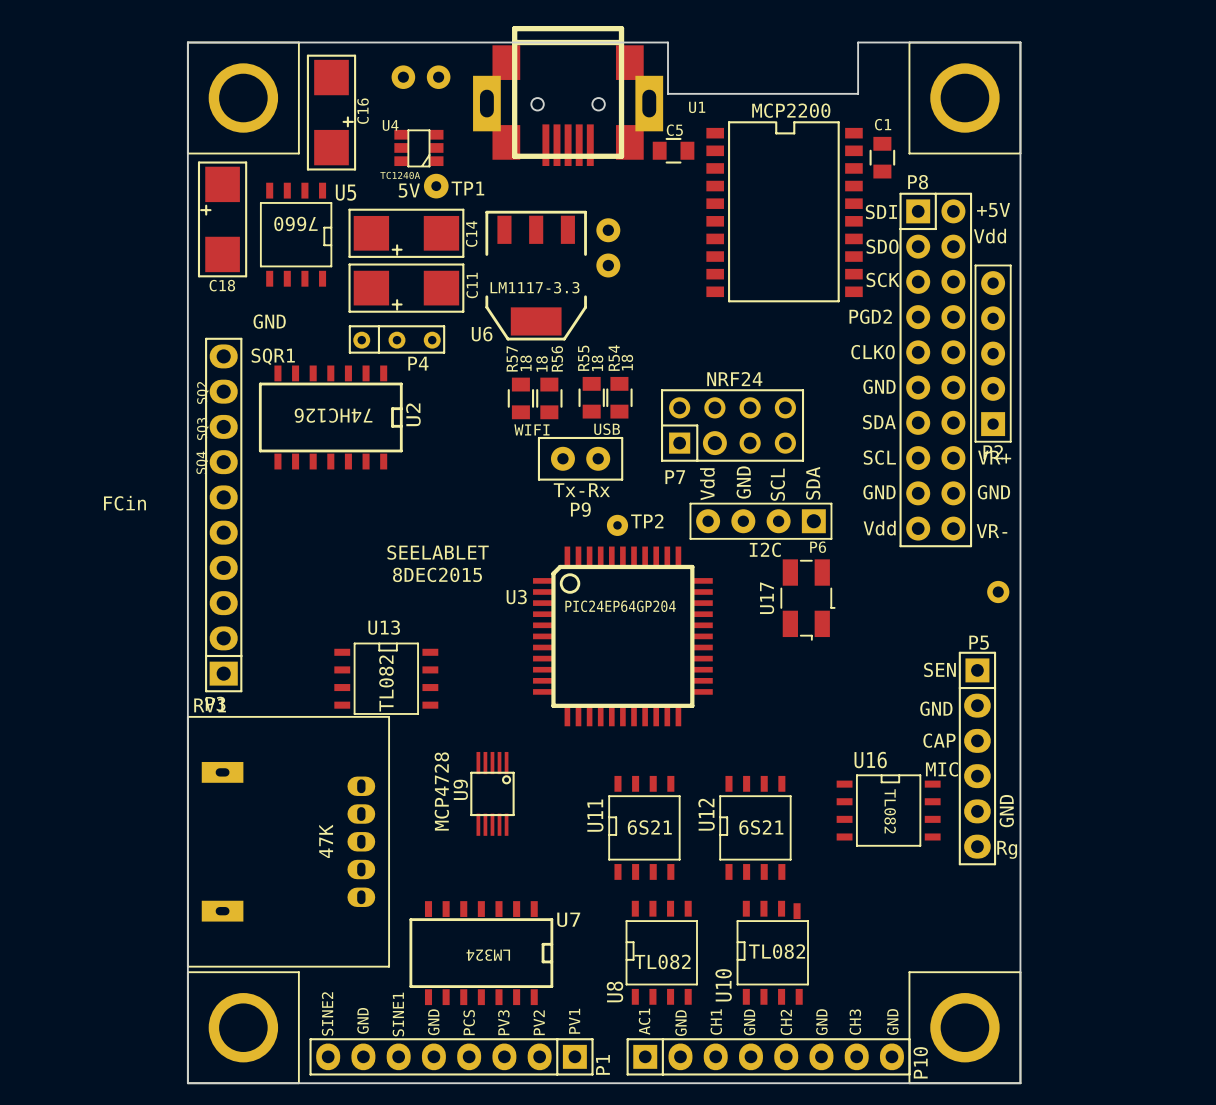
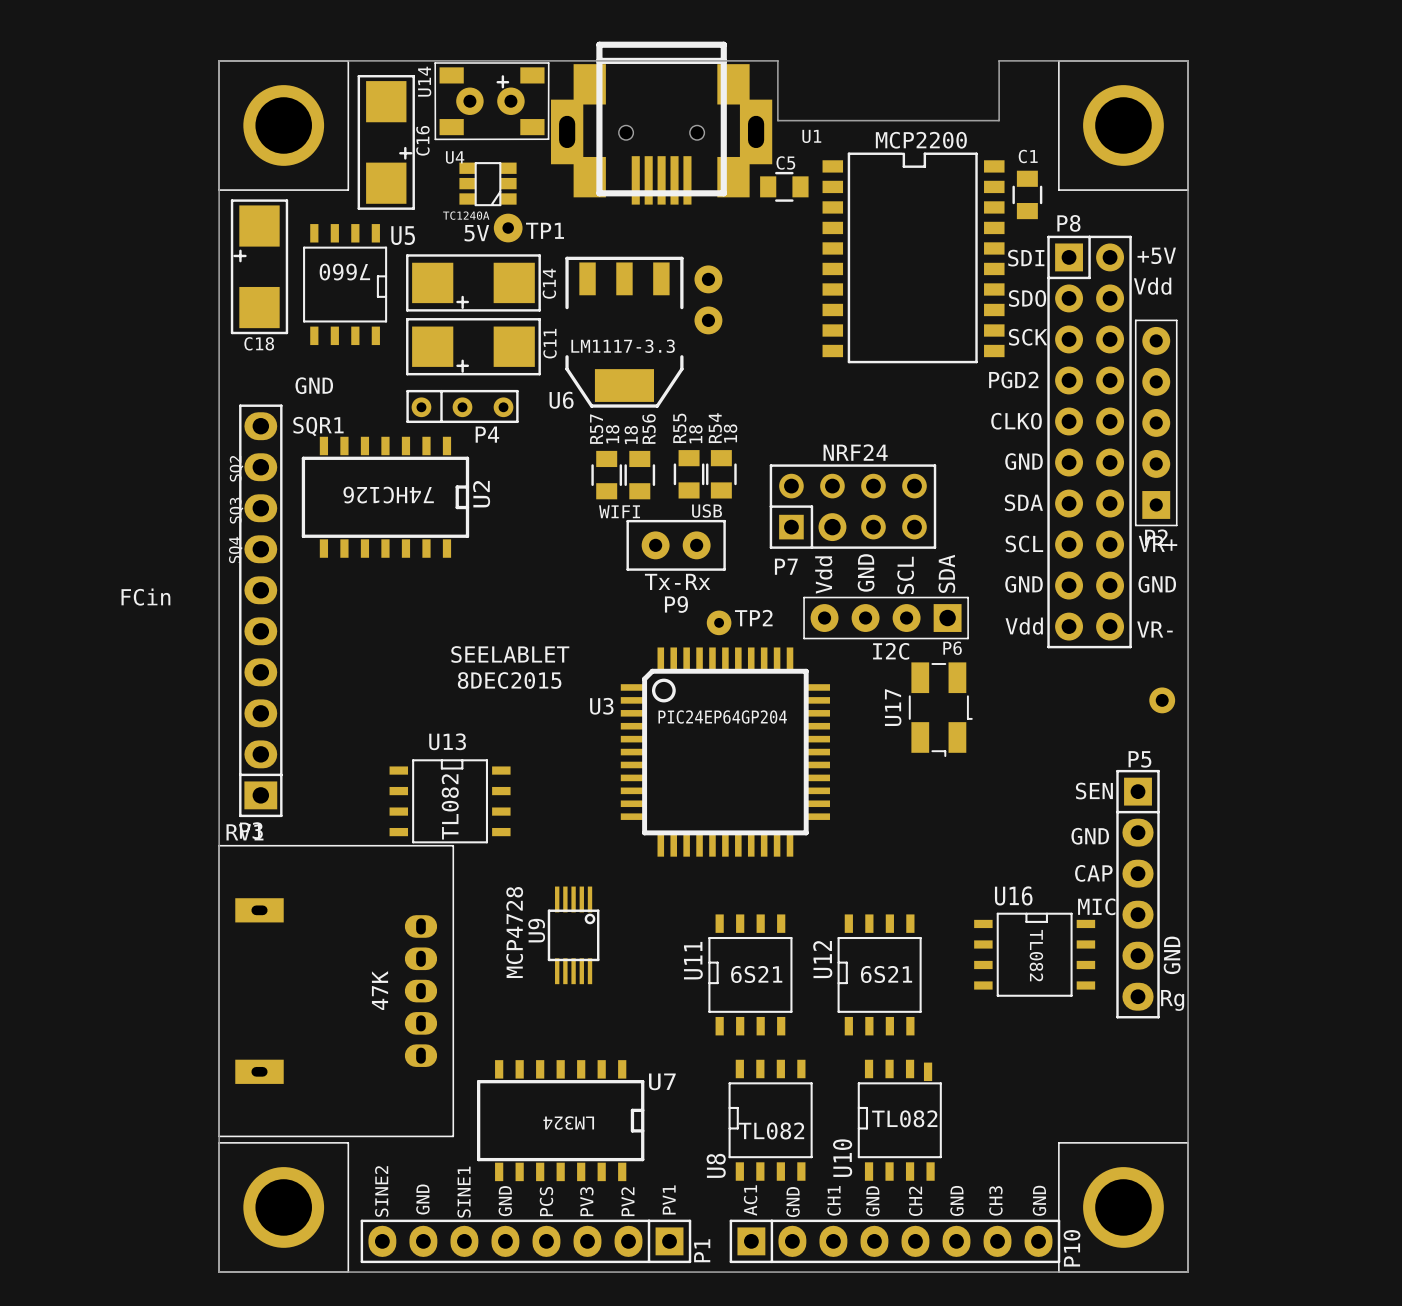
U14: none -> (491, 101)

